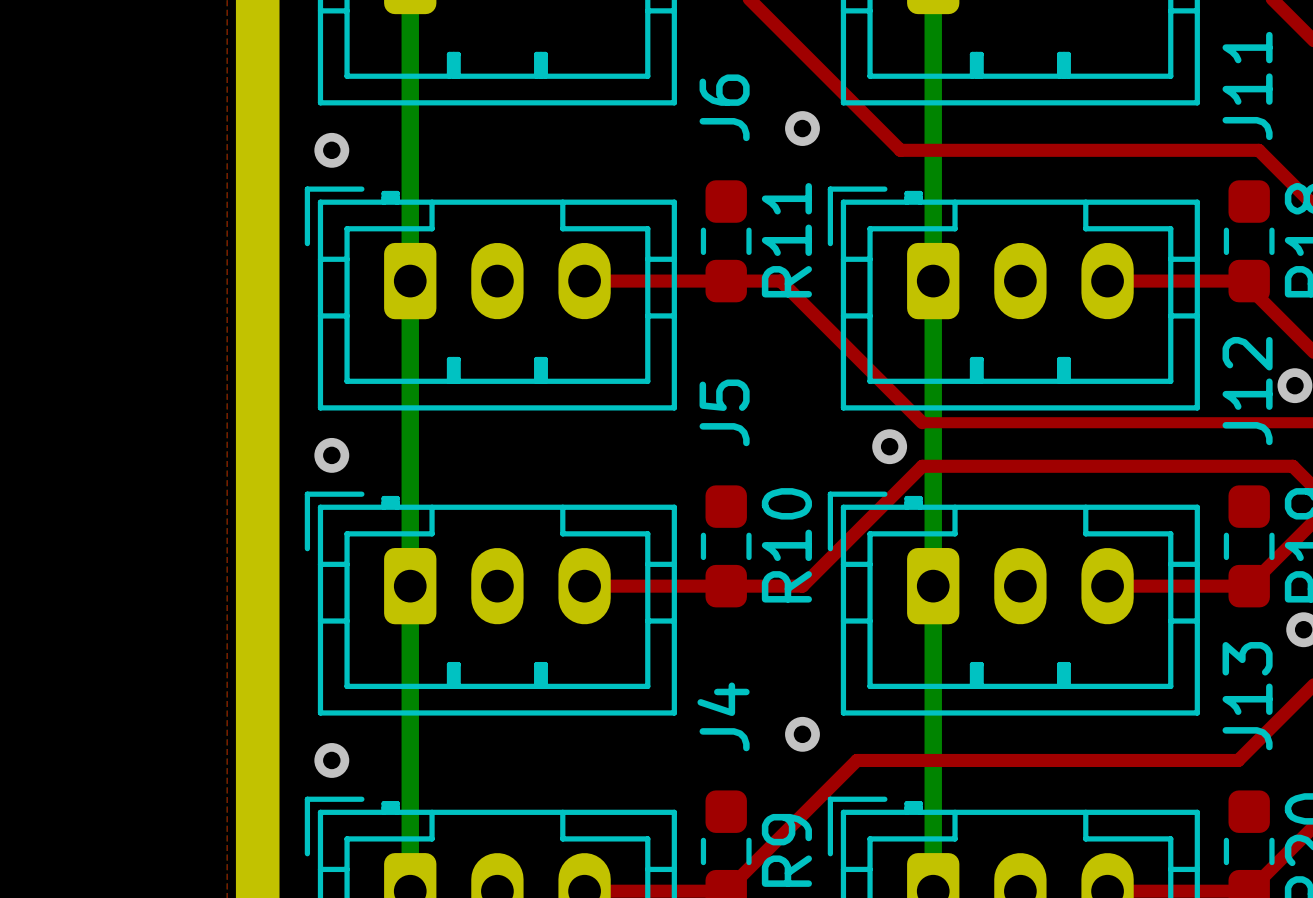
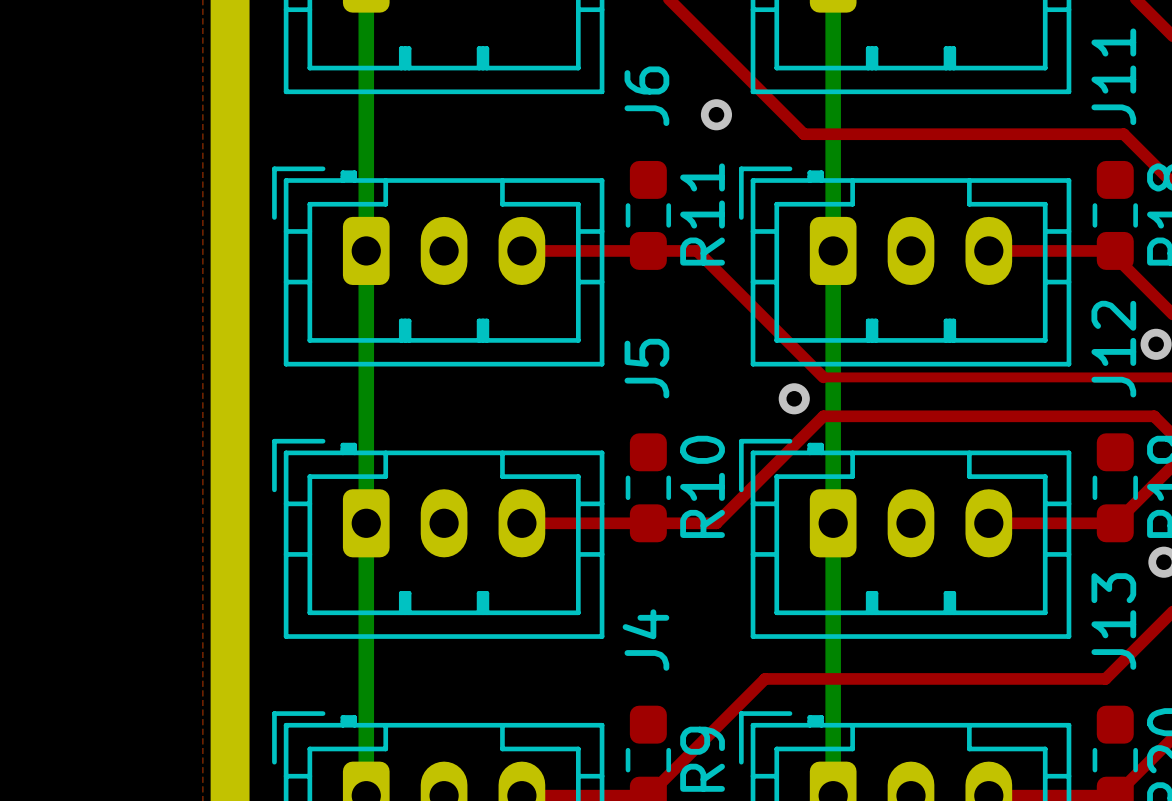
via: (331, 150) -> none
via: (331, 455) -> none
via: (802, 734) -> none
via: (331, 760) -> none

